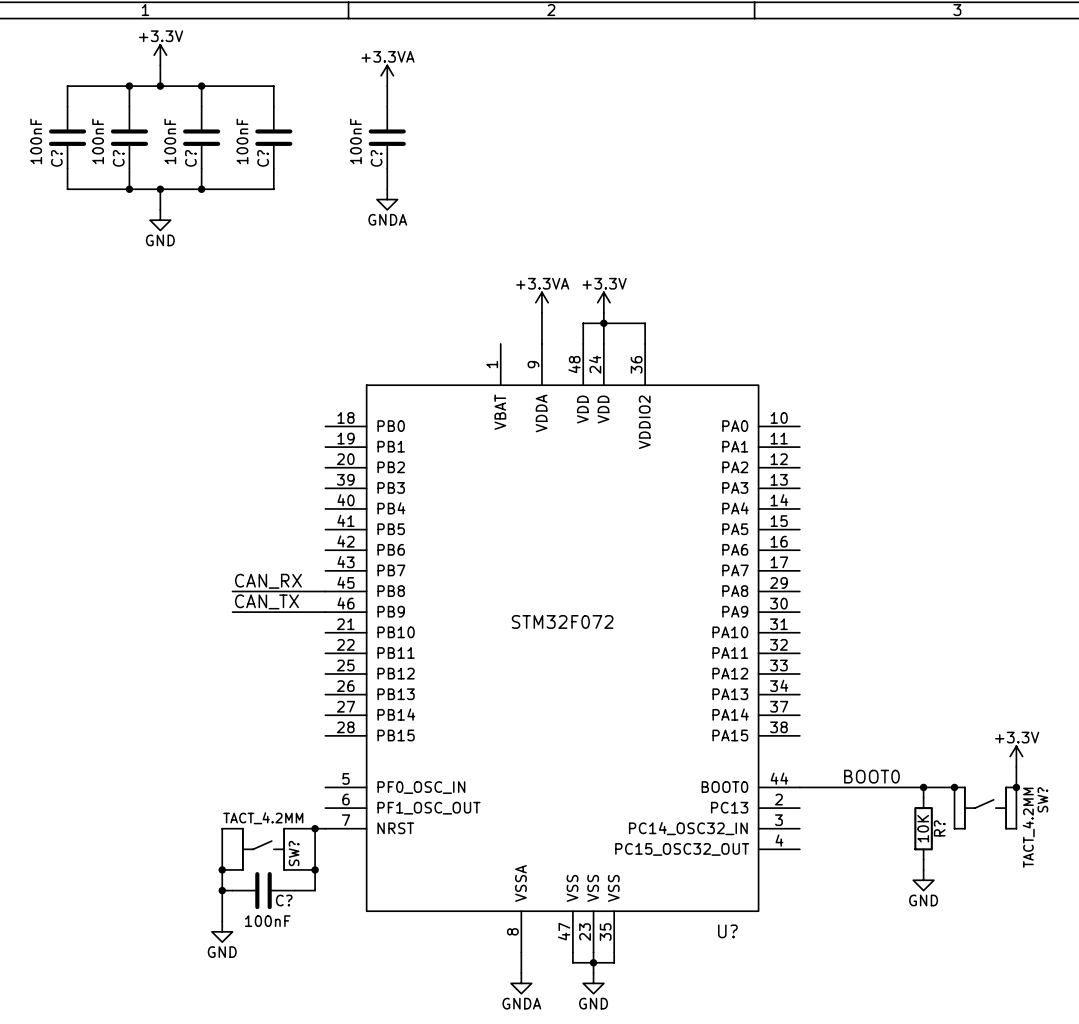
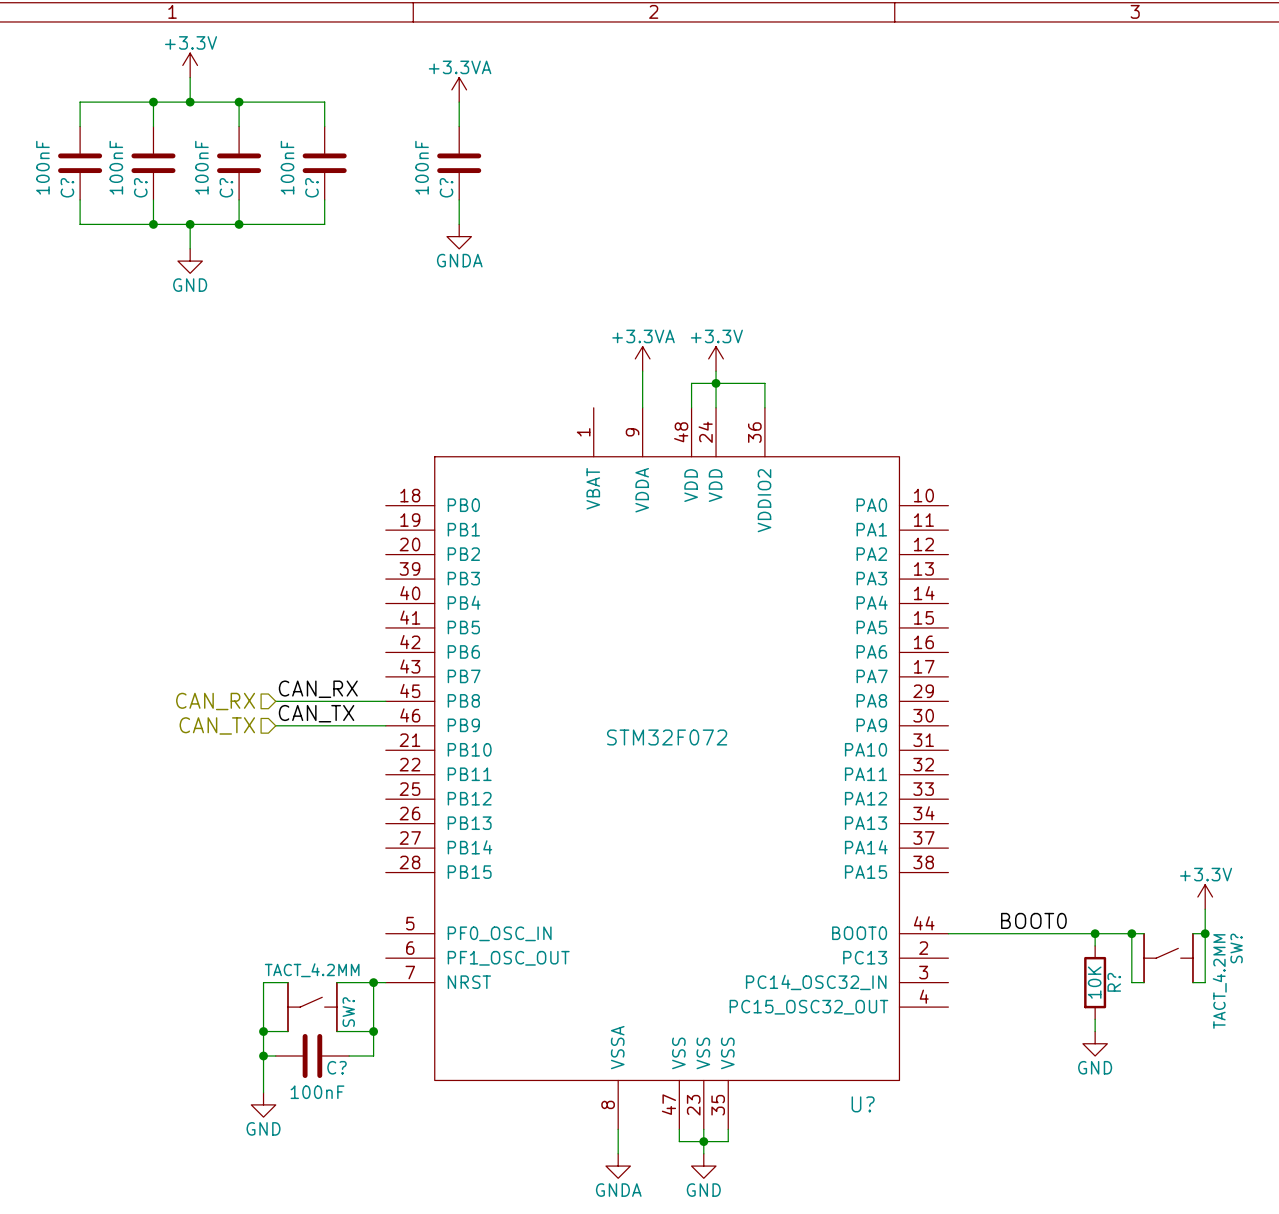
hierarchical label: none -> CAN_RX (215, 701)
hierarchical label: none -> CAN_TX (217, 725)

